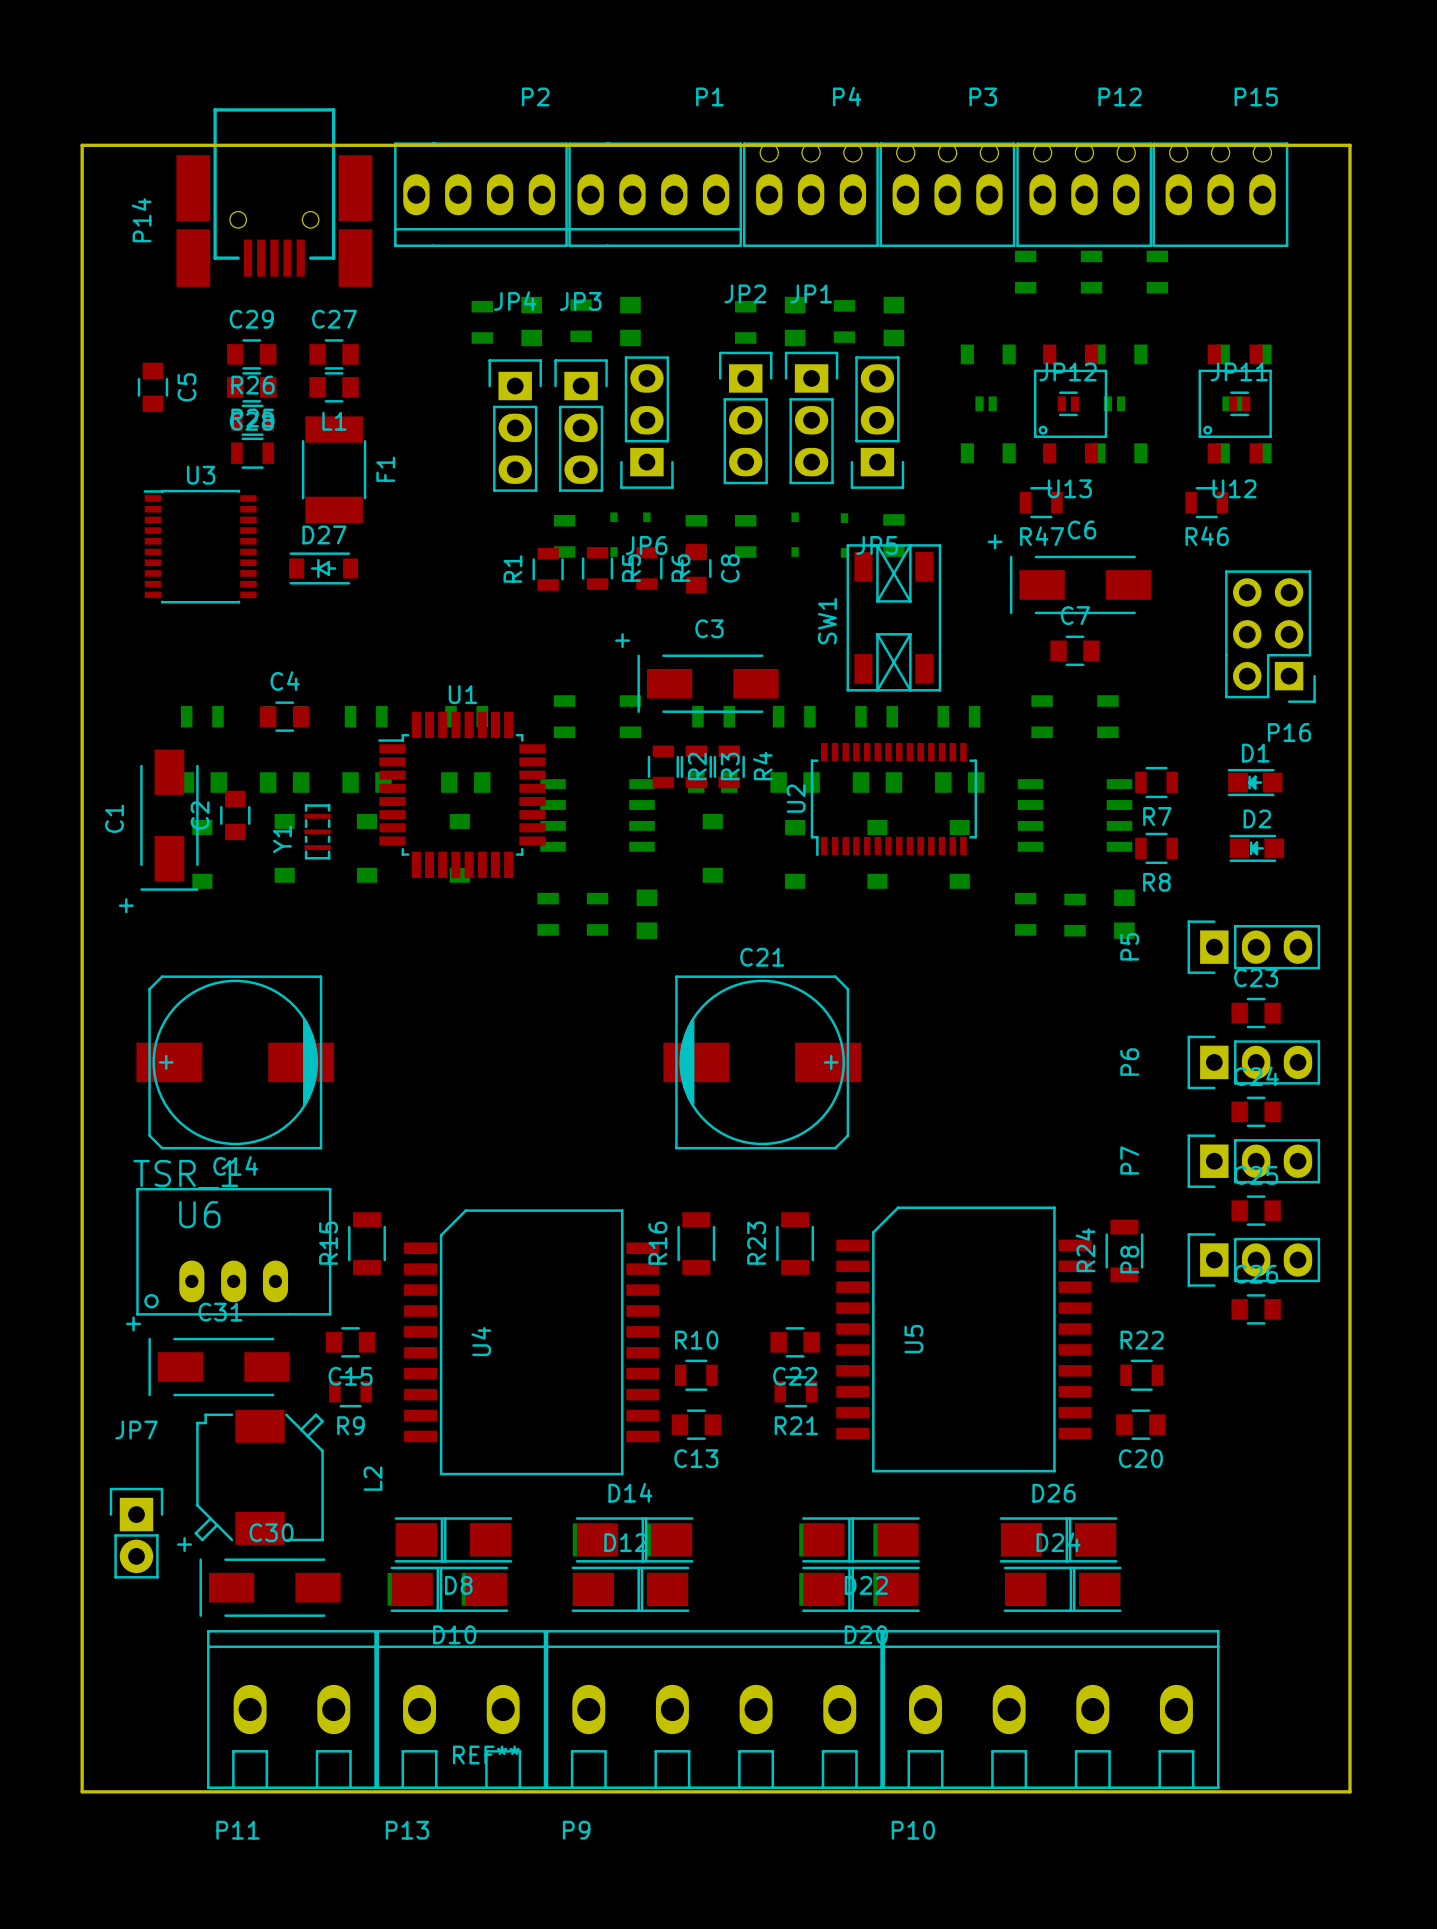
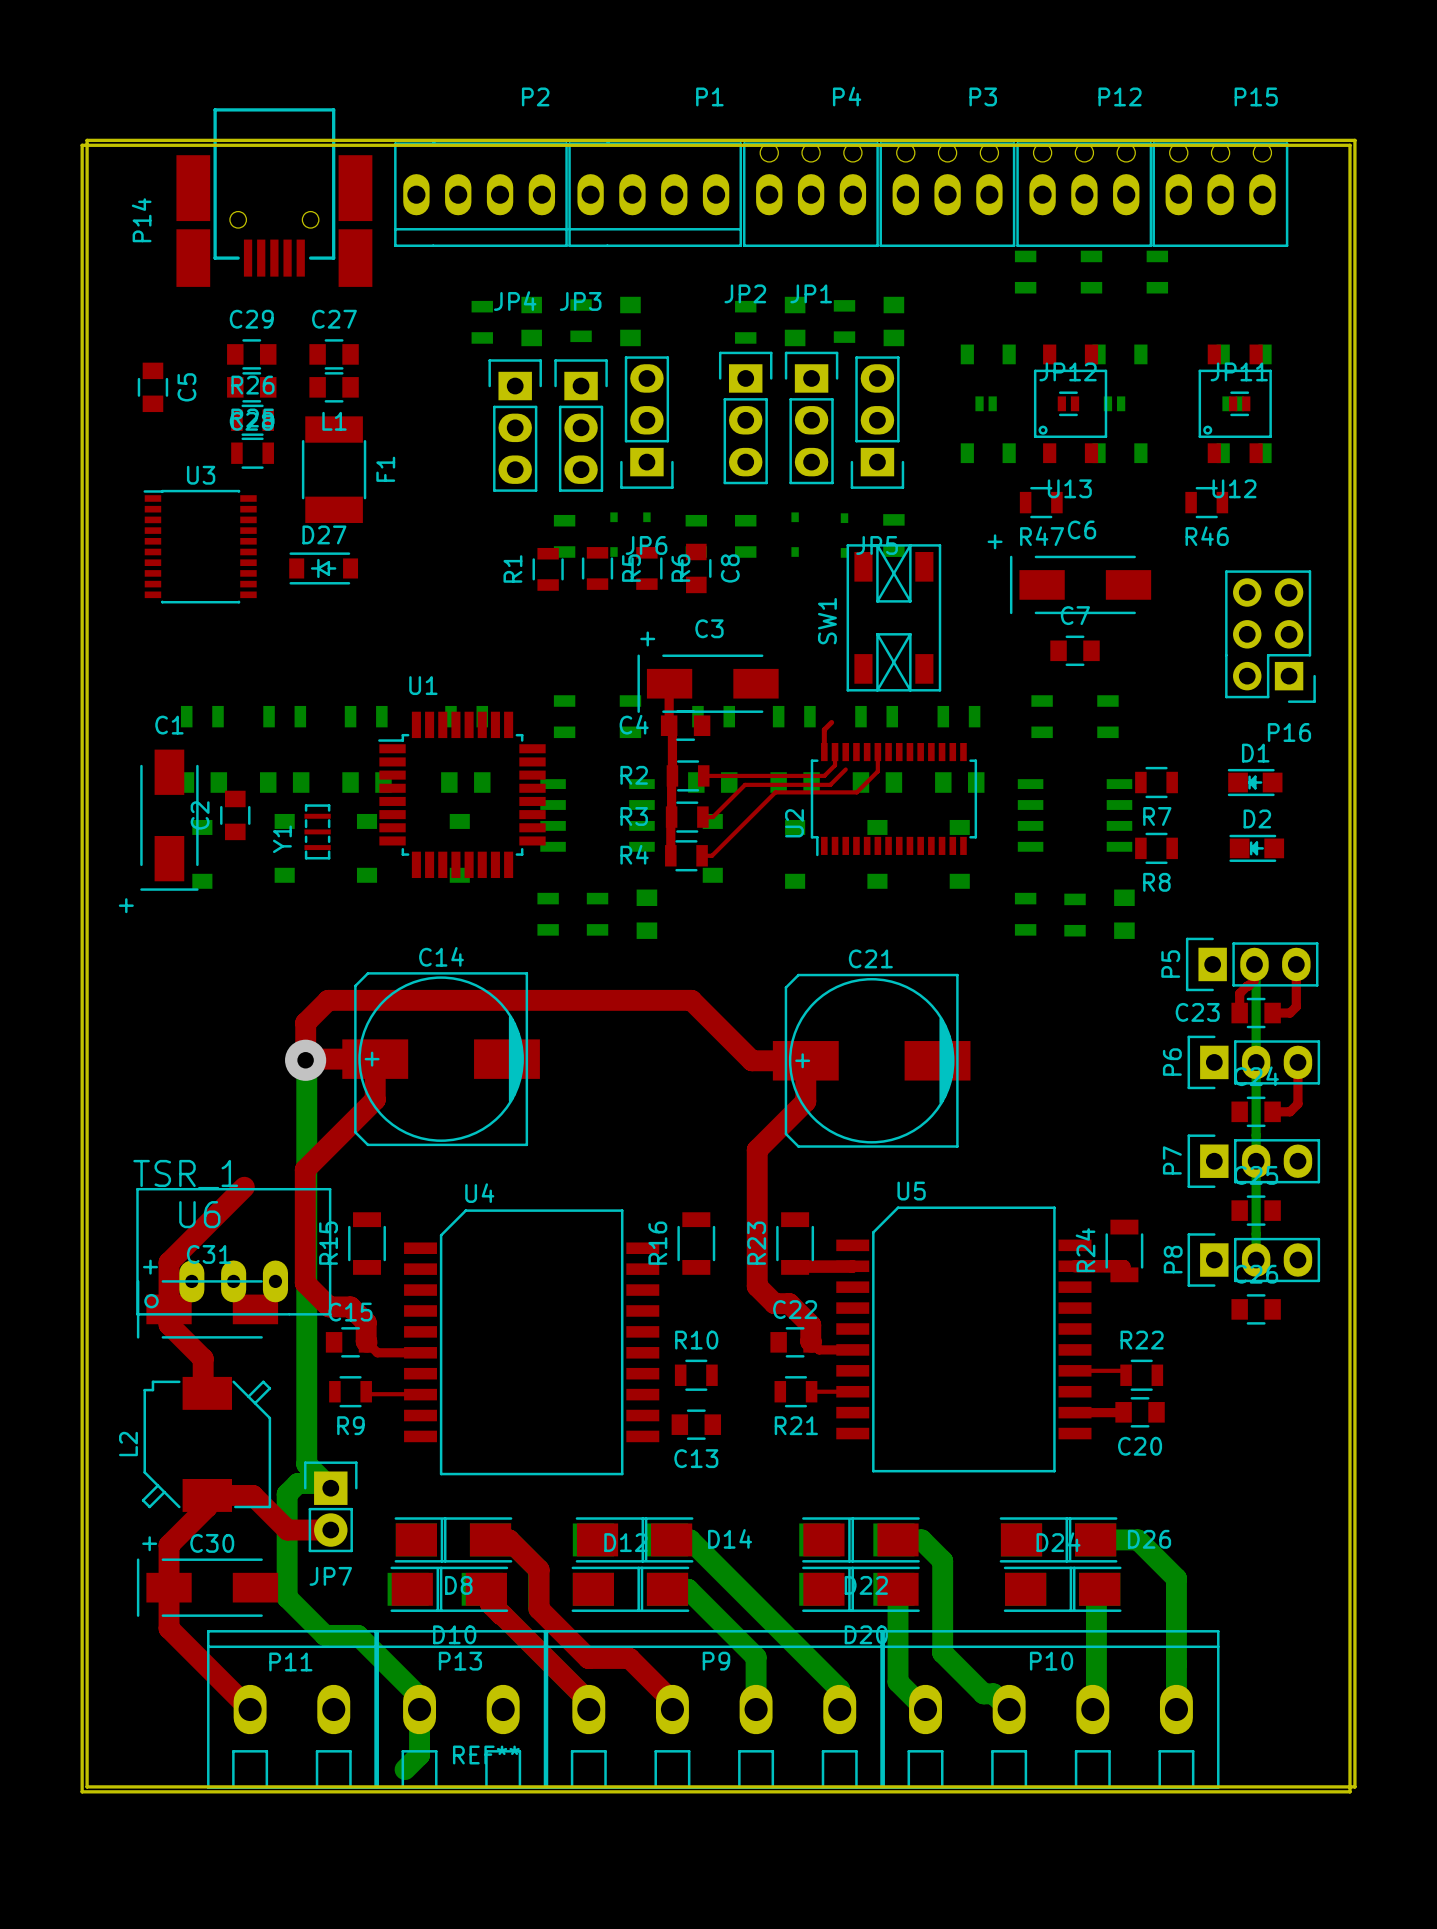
drawing: none -> [85, 138, 1357, 1789]
C3 text position: + (622, 640) -> + (647, 638)
C4 name position: C4 (285, 681) -> C4 (634, 724)
top track: none -> (669, 683) (669, 725) (672, 729) (670, 855)
U1 name position: U1 (462, 694) -> U1 (423, 685)
C4 position: (284, 716) -> (685, 725)
top track: none -> (831, 722) (824, 729) (824, 752)
top track: none -> (835, 752) (835, 765) (824, 775) (703, 775)
top track: none -> (877, 752) (877, 771) (856, 792) (775, 792) (712, 855) (702, 855)
R2 rotation: 0° (663, 766) -> 90° clockwise (688, 775)
R2 position: (663, 766) -> (688, 775)
R3 rotation: 0° (696, 766) -> 90° clockwise (687, 817)
R3 position: (696, 766) -> (687, 817)
R2 name position: R2 (697, 766) -> R2 (634, 775)
R4 rotation: 0° (729, 766) -> 90° clockwise (686, 855)
R4 position: (729, 766) -> (686, 855)
R3 name position: R3 (730, 766) -> R3 (634, 816)
R4 name position: R4 (762, 766) -> R4 (634, 854)
top track: none -> (845, 769) (830, 784) (745, 784) (712, 817) (702, 817)
U2 name position: U2 (796, 798) -> U2 (794, 823)
C1 name rotation: 0° (114, 818) -> 90° clockwise (169, 725)
C1 name position: C1 (114, 818) -> C1 (169, 725)
P5 name position: P5 (1129, 946) -> P5 (1170, 964)
P5 position: (1253, 947) -> (1252, 964)
top track: none -> (1254, 964) (1254, 980) (1239, 993) (1239, 1013)
bottom track: none -> (1254, 964) (1256, 966) (1256, 1260)
top track: none -> (1296, 964) (1296, 1006)
C23 name position: C23 (1256, 977) -> C23 (1197, 1012)
top track: none -> (1296, 1006) (1290, 1013) (1272, 1013)
top track: none -> (305, 1060) (305, 1022) (328, 1000) (691, 1000) (751, 1060) (805, 1060) (805, 1101) (757, 1150) (757, 1286) (774, 1303) (789, 1303) (810, 1325) (810, 1341) (819, 1349) (852, 1349)
top track: none -> (305, 1060) (375, 1059) (375, 1099) (305, 1169) (305, 1283) (329, 1306) (350, 1306) (366, 1322) (366, 1341) (377, 1352) (420, 1352)
bottom track: none -> (305, 1060) (306, 1464) (330, 1488)
via: none -> (305, 1060)
C14 position: (235, 1062) -> (441, 1059)
C21 rotation: 0° (762, 1062) -> 180° (871, 1060)
P6 name position: P6 (1129, 1062) -> P6 (1172, 1062)
top track: none -> (1297, 1062) (1297, 1103) (1290, 1111) (1272, 1111)
P7 name position: P7 (1129, 1160) -> P7 (1172, 1160)
C14 name position: C14 (235, 1165) -> C14 (441, 956)
top track: none -> (244, 1187) (169, 1262) (169, 1324) (203, 1358) (203, 1389) (207, 1393)
P8 name position: P8 (1129, 1259) -> P8 (1173, 1259)
top track: none -> (852, 1266) (795, 1266)
top track: none -> (1075, 1266) (1124, 1266)
C31 text position: + (133, 1323) -> + (150, 1267)
U5 name rotation: 0° (913, 1339) -> 90° clockwise (911, 1191)
U5 name position: U5 (913, 1339) -> U5 (911, 1191)
U4 name rotation: 0° (481, 1341) -> 90° clockwise (479, 1193)
U4 name position: U4 (481, 1341) -> U4 (479, 1193)
C31 position: (219, 1367) -> (207, 1309)
top track: none -> (1075, 1370) (1124, 1371)
C15 name position: C15 (350, 1376) -> C15 (350, 1312)
C22 name position: C22 (795, 1376) -> C22 (795, 1309)
top track: none -> (811, 1391) (852, 1391)
top track: none -> (366, 1394) (420, 1394)
top track: none -> (1123, 1412) (1075, 1412)
C20 position: (1140, 1424) -> (1140, 1412)
JP7 name position: JP7 (136, 1429) -> JP7 (330, 1576)
L2 position: (259, 1477) -> (206, 1444)
L2 name position: L2 (372, 1478) -> L2 (128, 1444)
bottom track: none -> (326, 1483) (297, 1483) (287, 1494) (287, 1597) (325, 1635) (357, 1635) (419, 1697) (419, 1755) (405, 1769)
D14 name position: D14 (630, 1492) -> D14 (730, 1538)
D26 name position: D26 (1054, 1493) -> D26 (1149, 1539)
top track: none -> (330, 1530) (287, 1530) (252, 1495) (207, 1495) (207, 1506) (169, 1545) (169, 1628) (250, 1709)
C30 name position: C30 (271, 1532) -> C30 (212, 1543)
JP7 position: (136, 1533) -> (330, 1506)
top track: none -> (490, 1539) (509, 1539) (539, 1569) (539, 1609) (588, 1658) (629, 1658) (672, 1701) (672, 1709)
bottom track: none -> (671, 1539) (690, 1539) (839, 1689) (839, 1709)
bottom track: none -> (898, 1539) (921, 1539) (942, 1560) (942, 1652) (983, 1693) (993, 1693) (1009, 1709)
bottom track: none -> (1096, 1539) (1137, 1539) (1176, 1578) (1176, 1709)
C30 text position: + (184, 1544) -> + (149, 1543)
C30 position: (270, 1587) -> (207, 1587)
top track: none -> (490, 1589) (490, 1604) (588, 1701) (588, 1709)
bottom track: none -> (671, 1589) (688, 1589) (756, 1657) (756, 1709)
bottom track: none -> (898, 1589) (898, 1682) (925, 1709)
bottom track: none -> (1096, 1589) (1096, 1705) (1092, 1709)
P11 name position: P11 (237, 1830) -> P11 (290, 1661)
P13 name position: P13 (407, 1830) -> P13 (460, 1661)
P9 name position: P9 (576, 1830) -> P9 (716, 1661)
P10 name position: P10 (913, 1830) -> P10 (1051, 1661)

